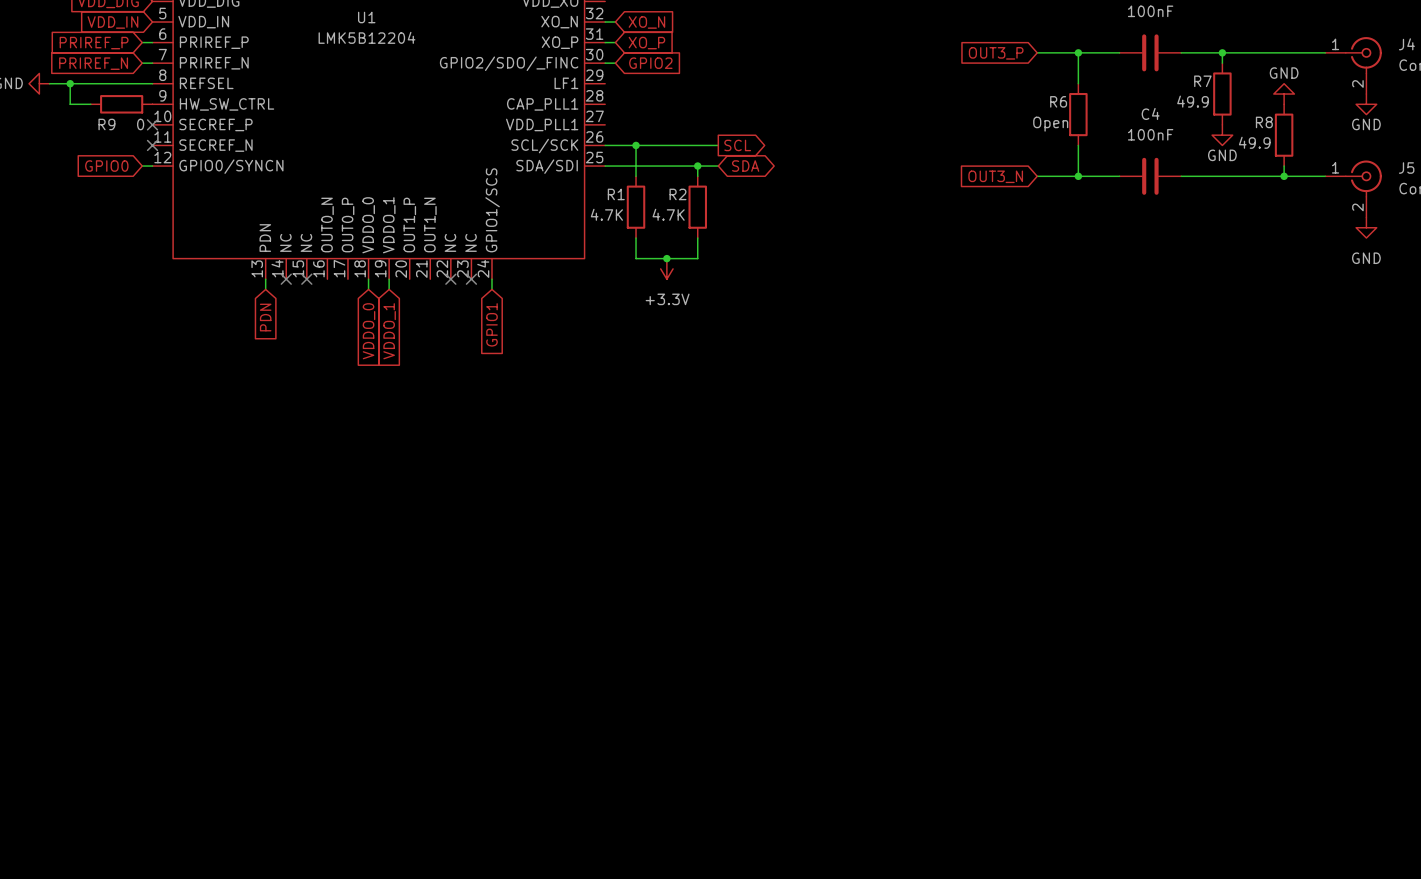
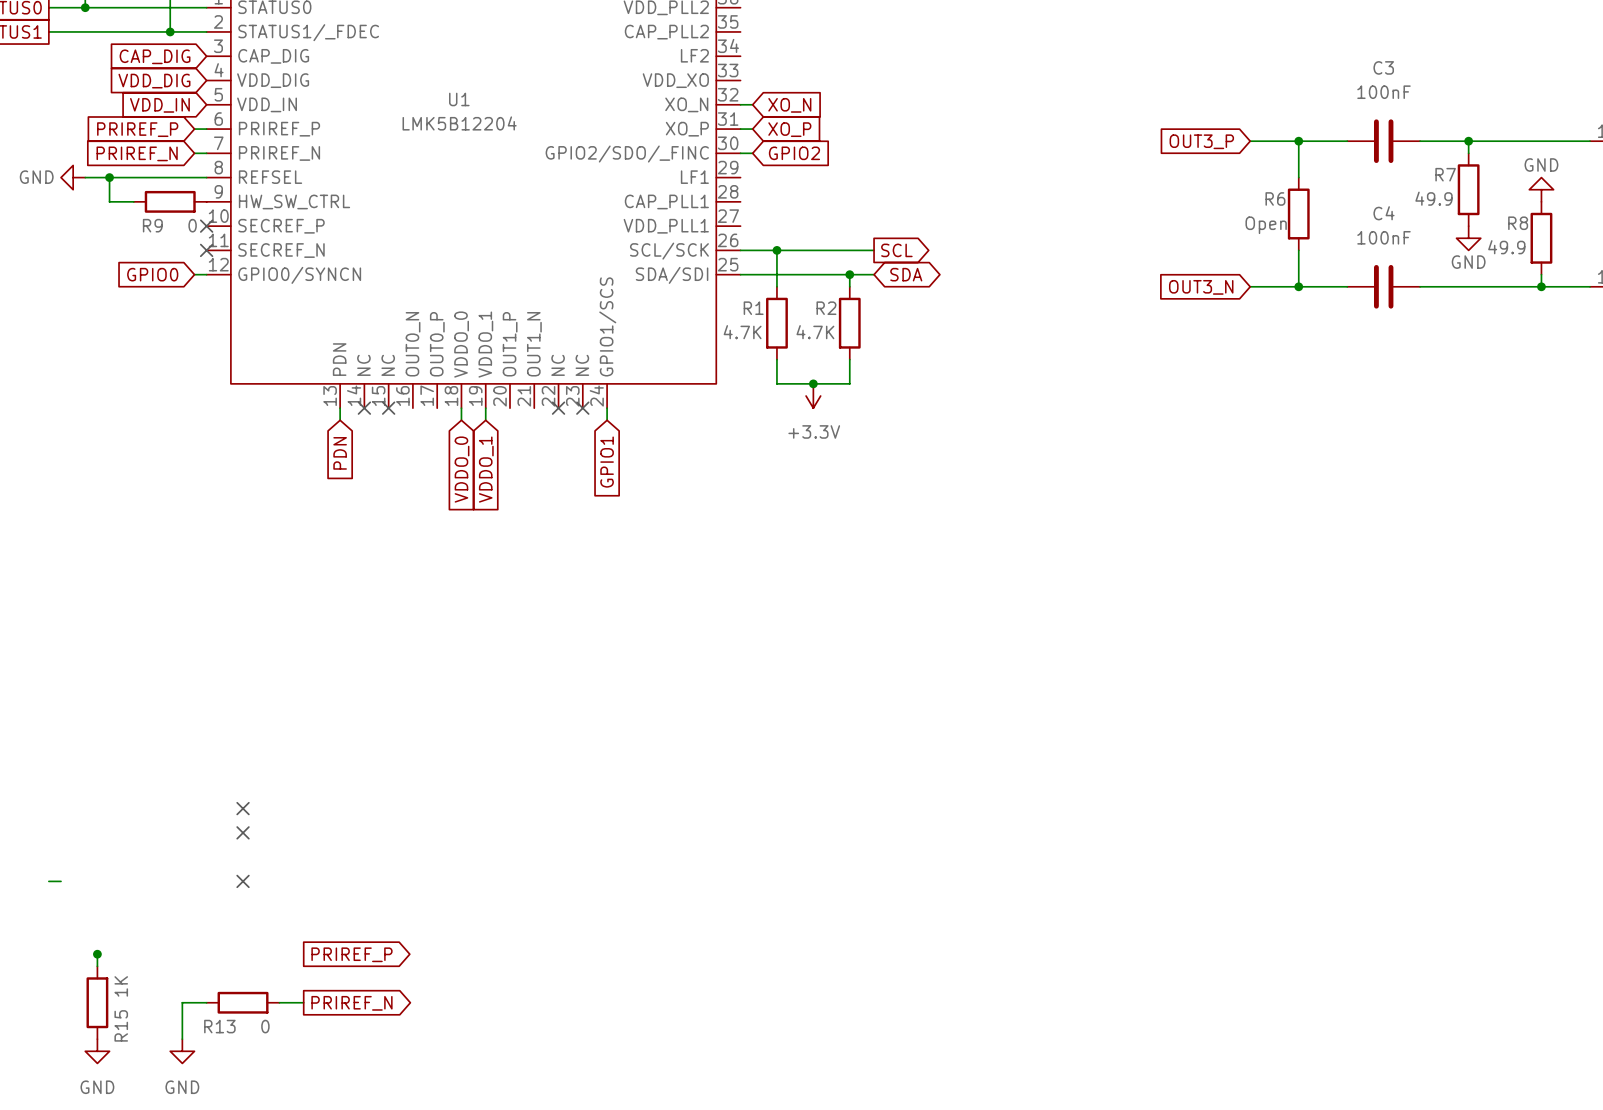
no-connect mark: none -> (243, 808)
no-connect mark: none -> (243, 832)
wire: none -> (48, 881) (61, 881)
no-connect mark: none -> (243, 881)
wire: none -> (97, 954) (97, 966)
junction: none -> (97, 954)
global label: none -> PRIREF_P (351, 954)
R15: none -> 1K (97, 1002)
wire: none -> (206, 1002) (182, 1002) (182, 1039)
R13: none -> 0 (243, 1002)
wire: none -> (279, 1002) (303, 1002)
global label: none -> PRIREF_N (351, 1003)
power symbol: none -> GND (97, 1051)
power symbol: none -> GND (182, 1051)

